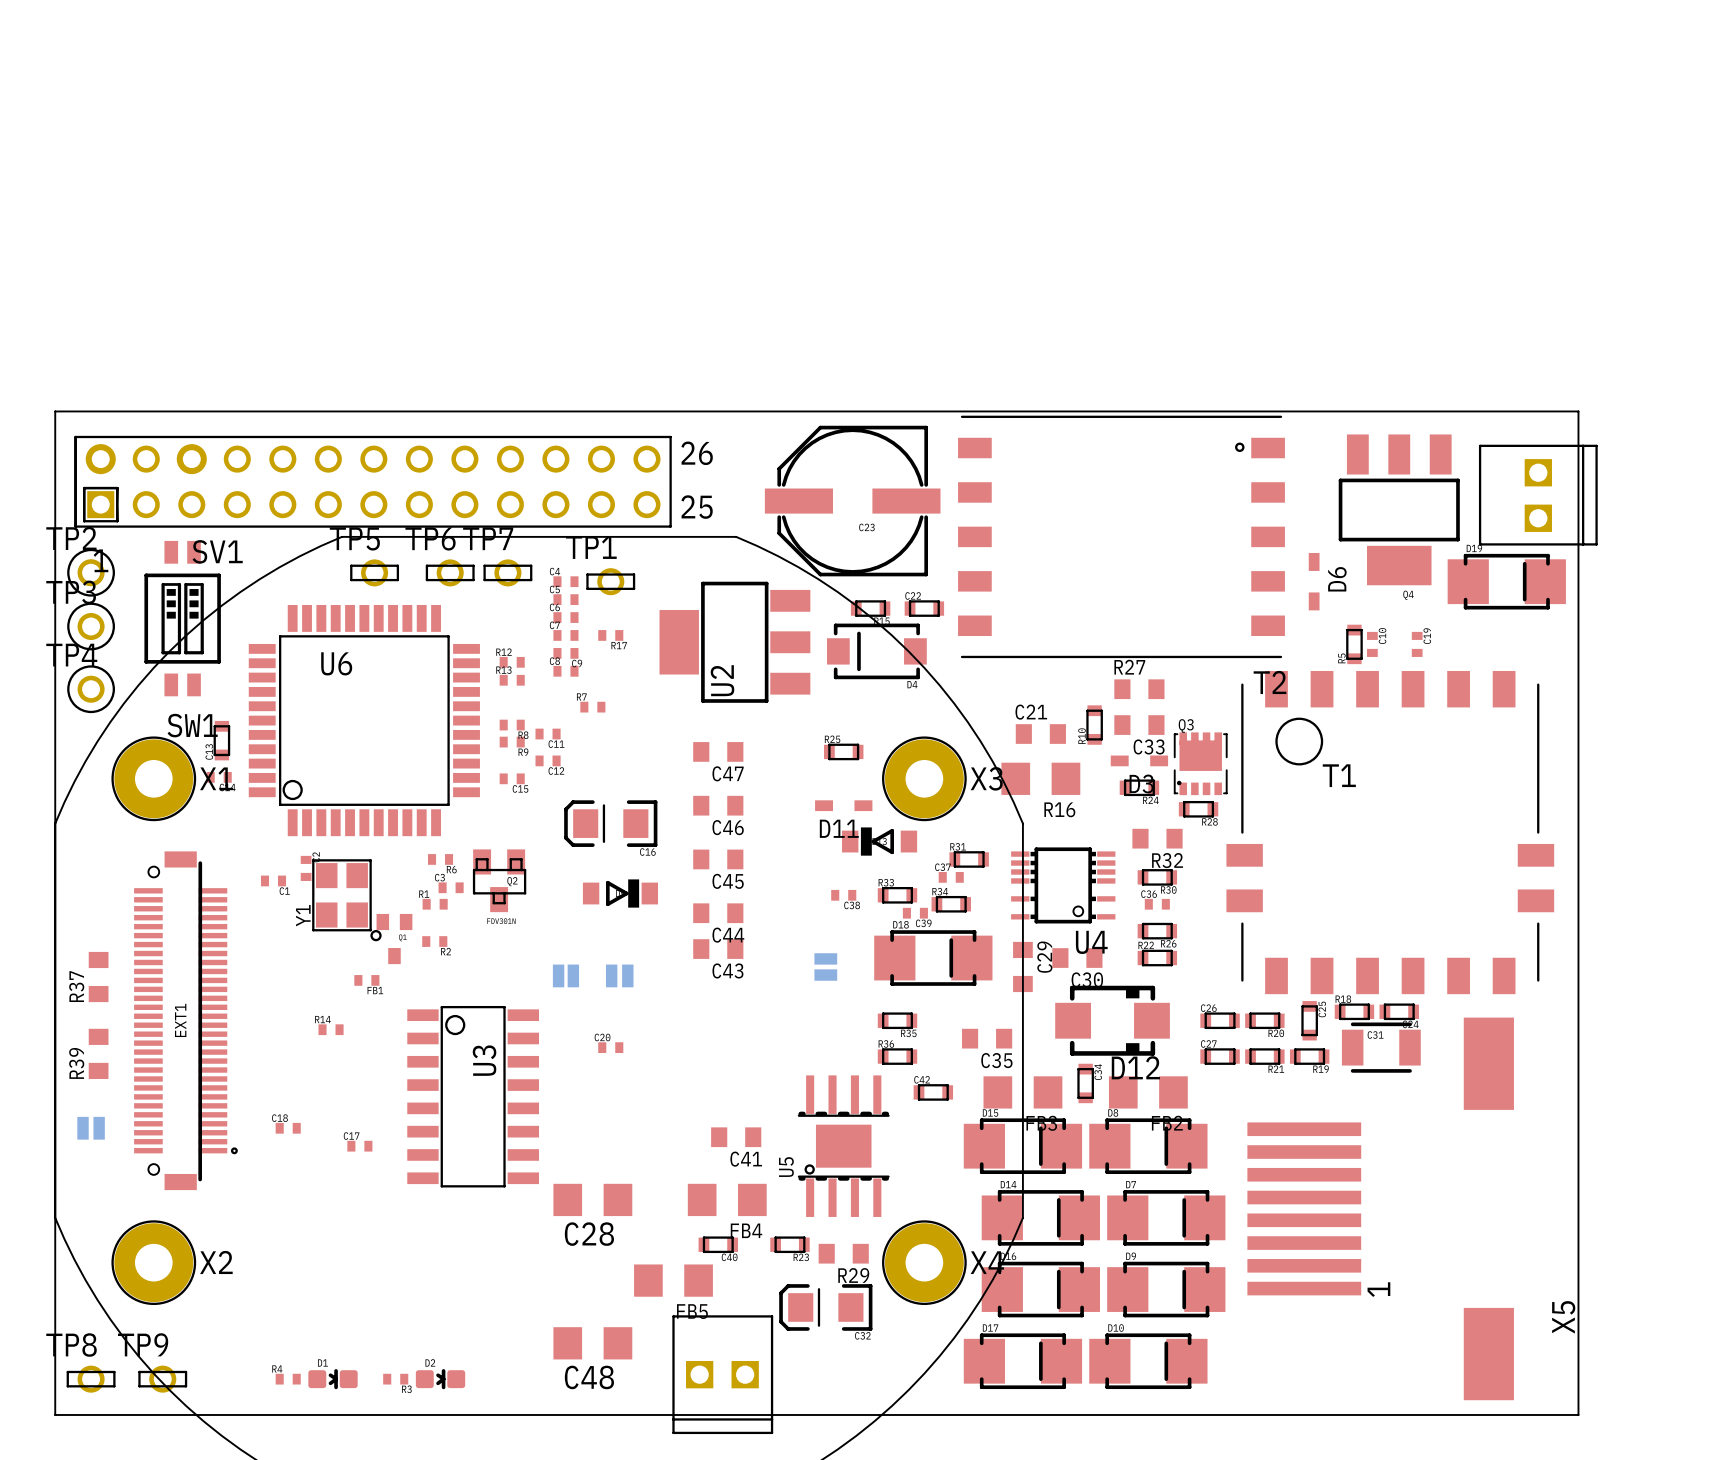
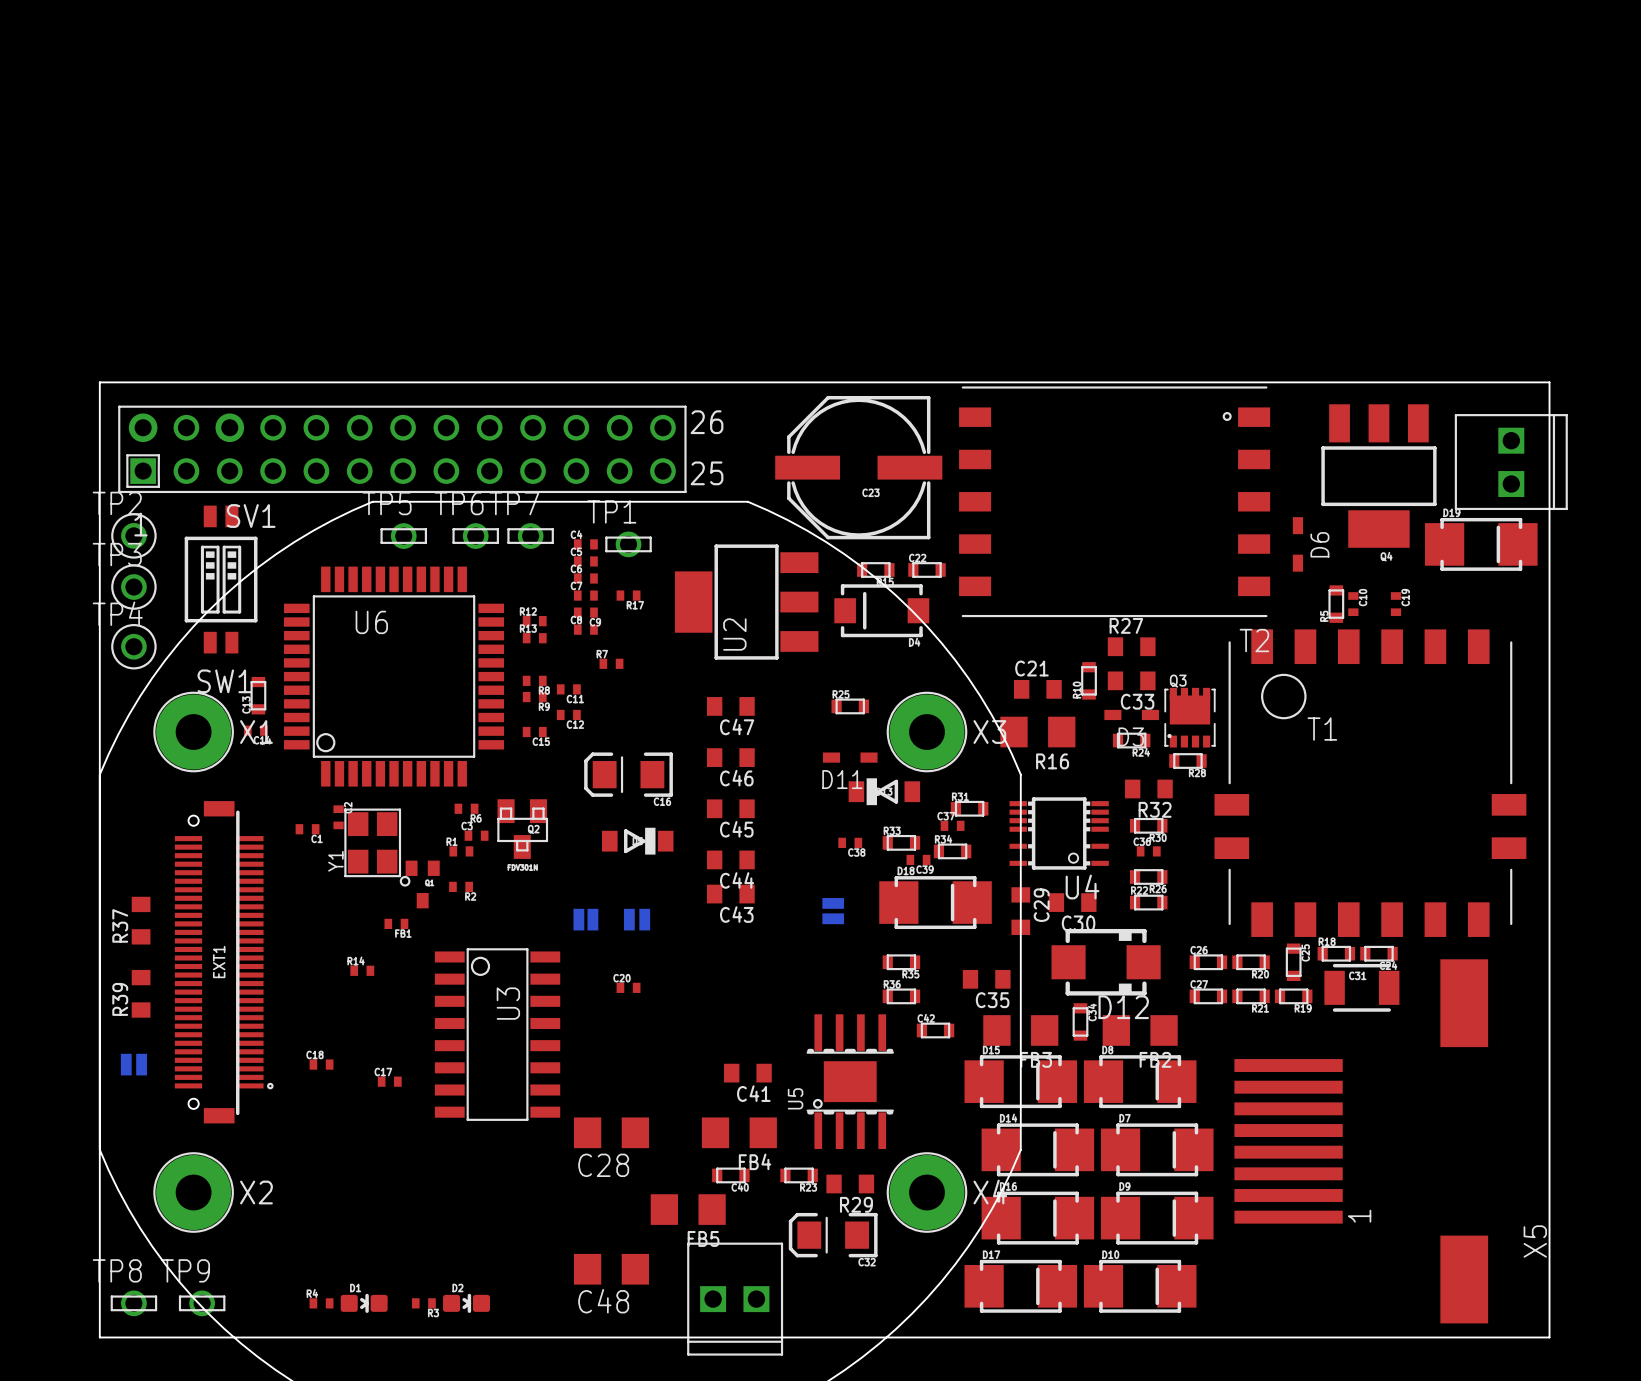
drawing: [74, 435, 119, 528] -> none

